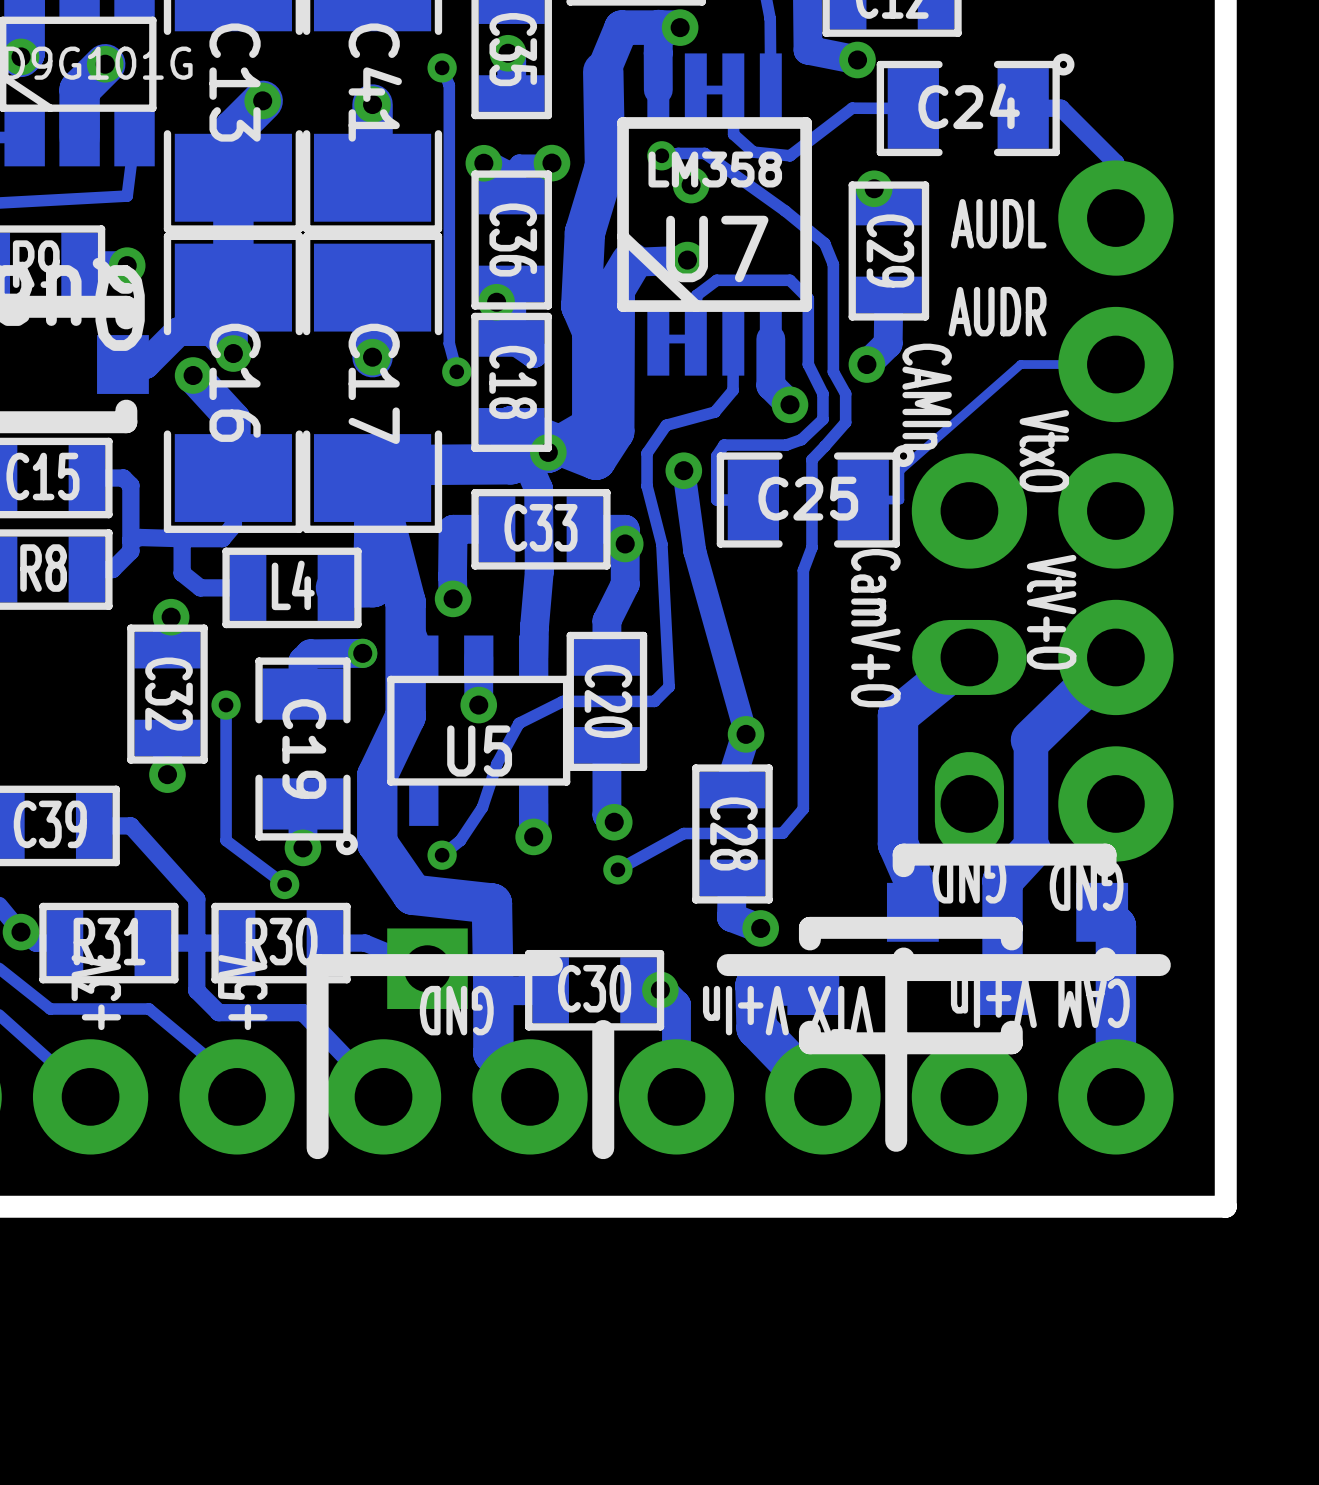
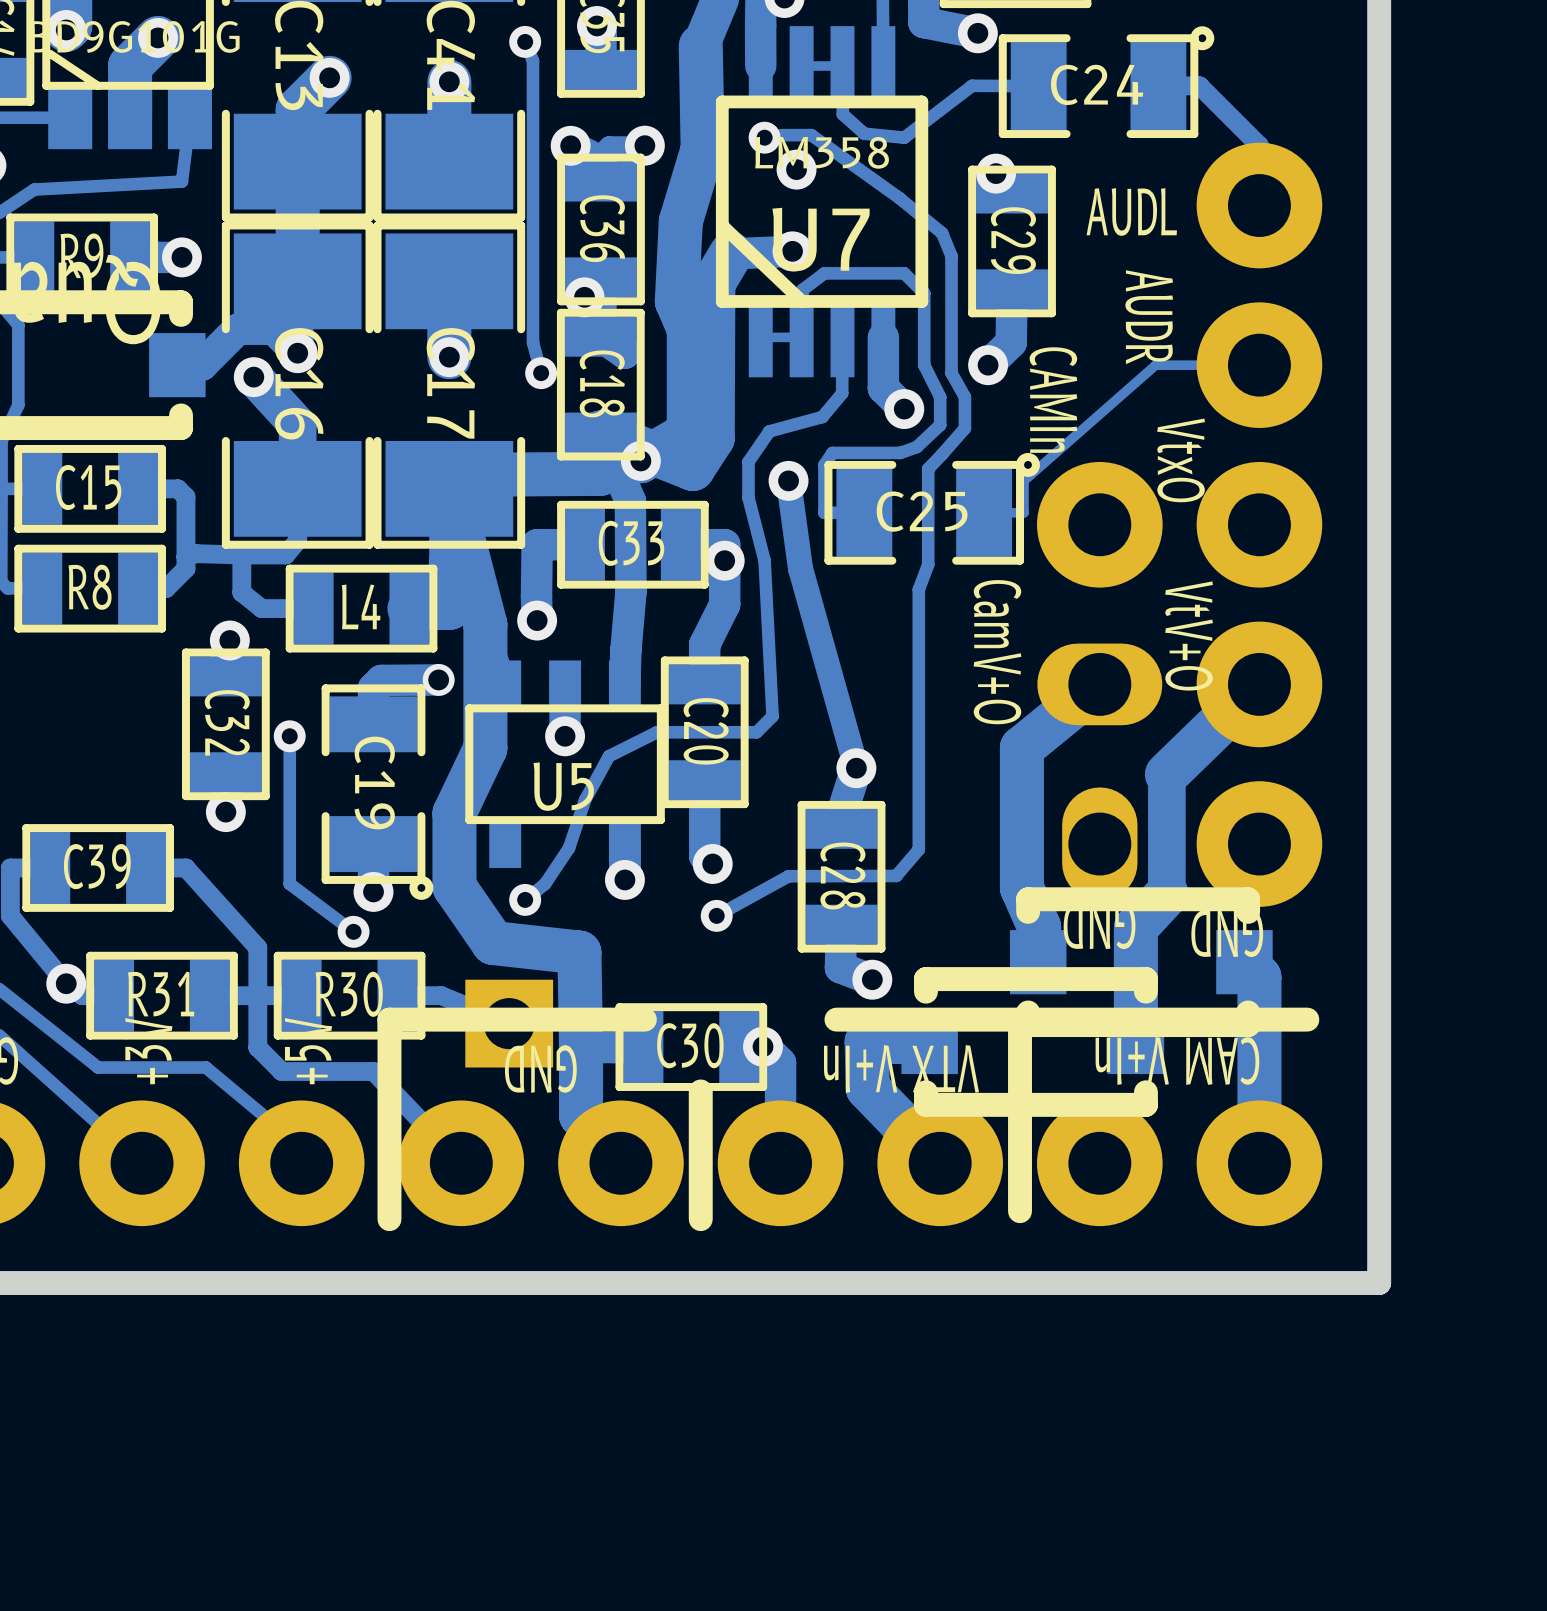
text rotation: 0° (997, 311) -> 90° clockwise (1149, 317)

